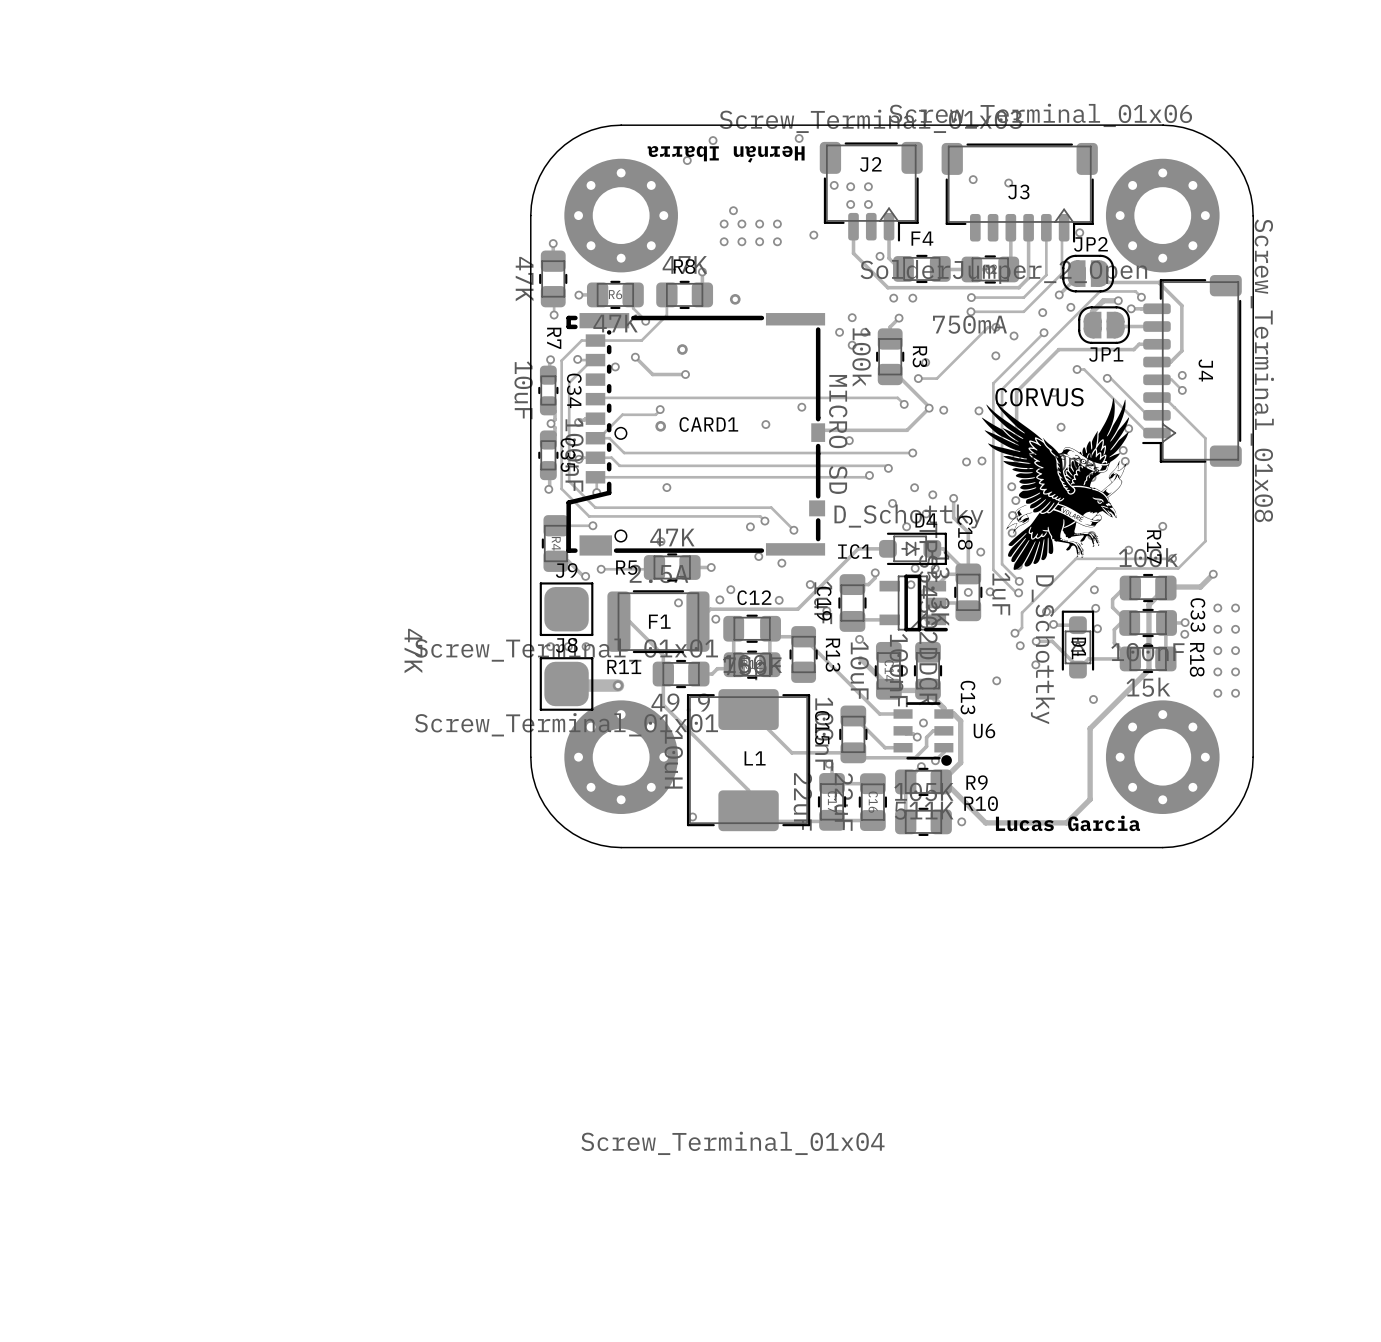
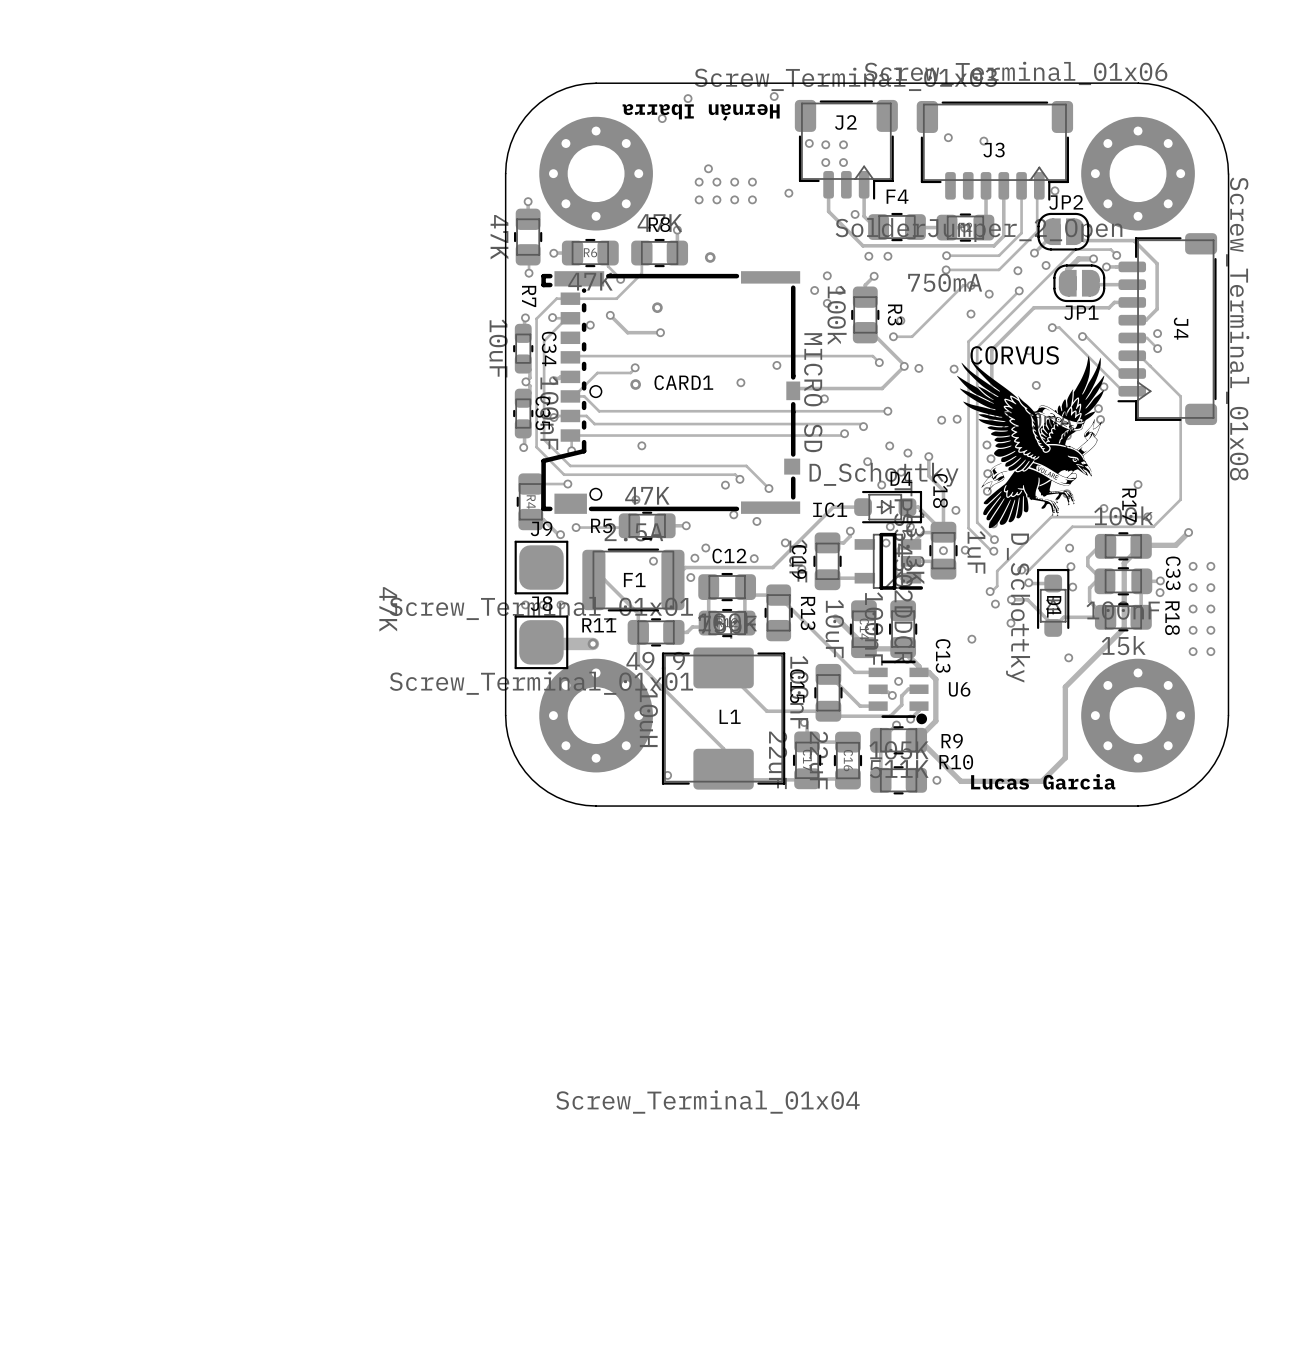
via: (859, 639) -> none

